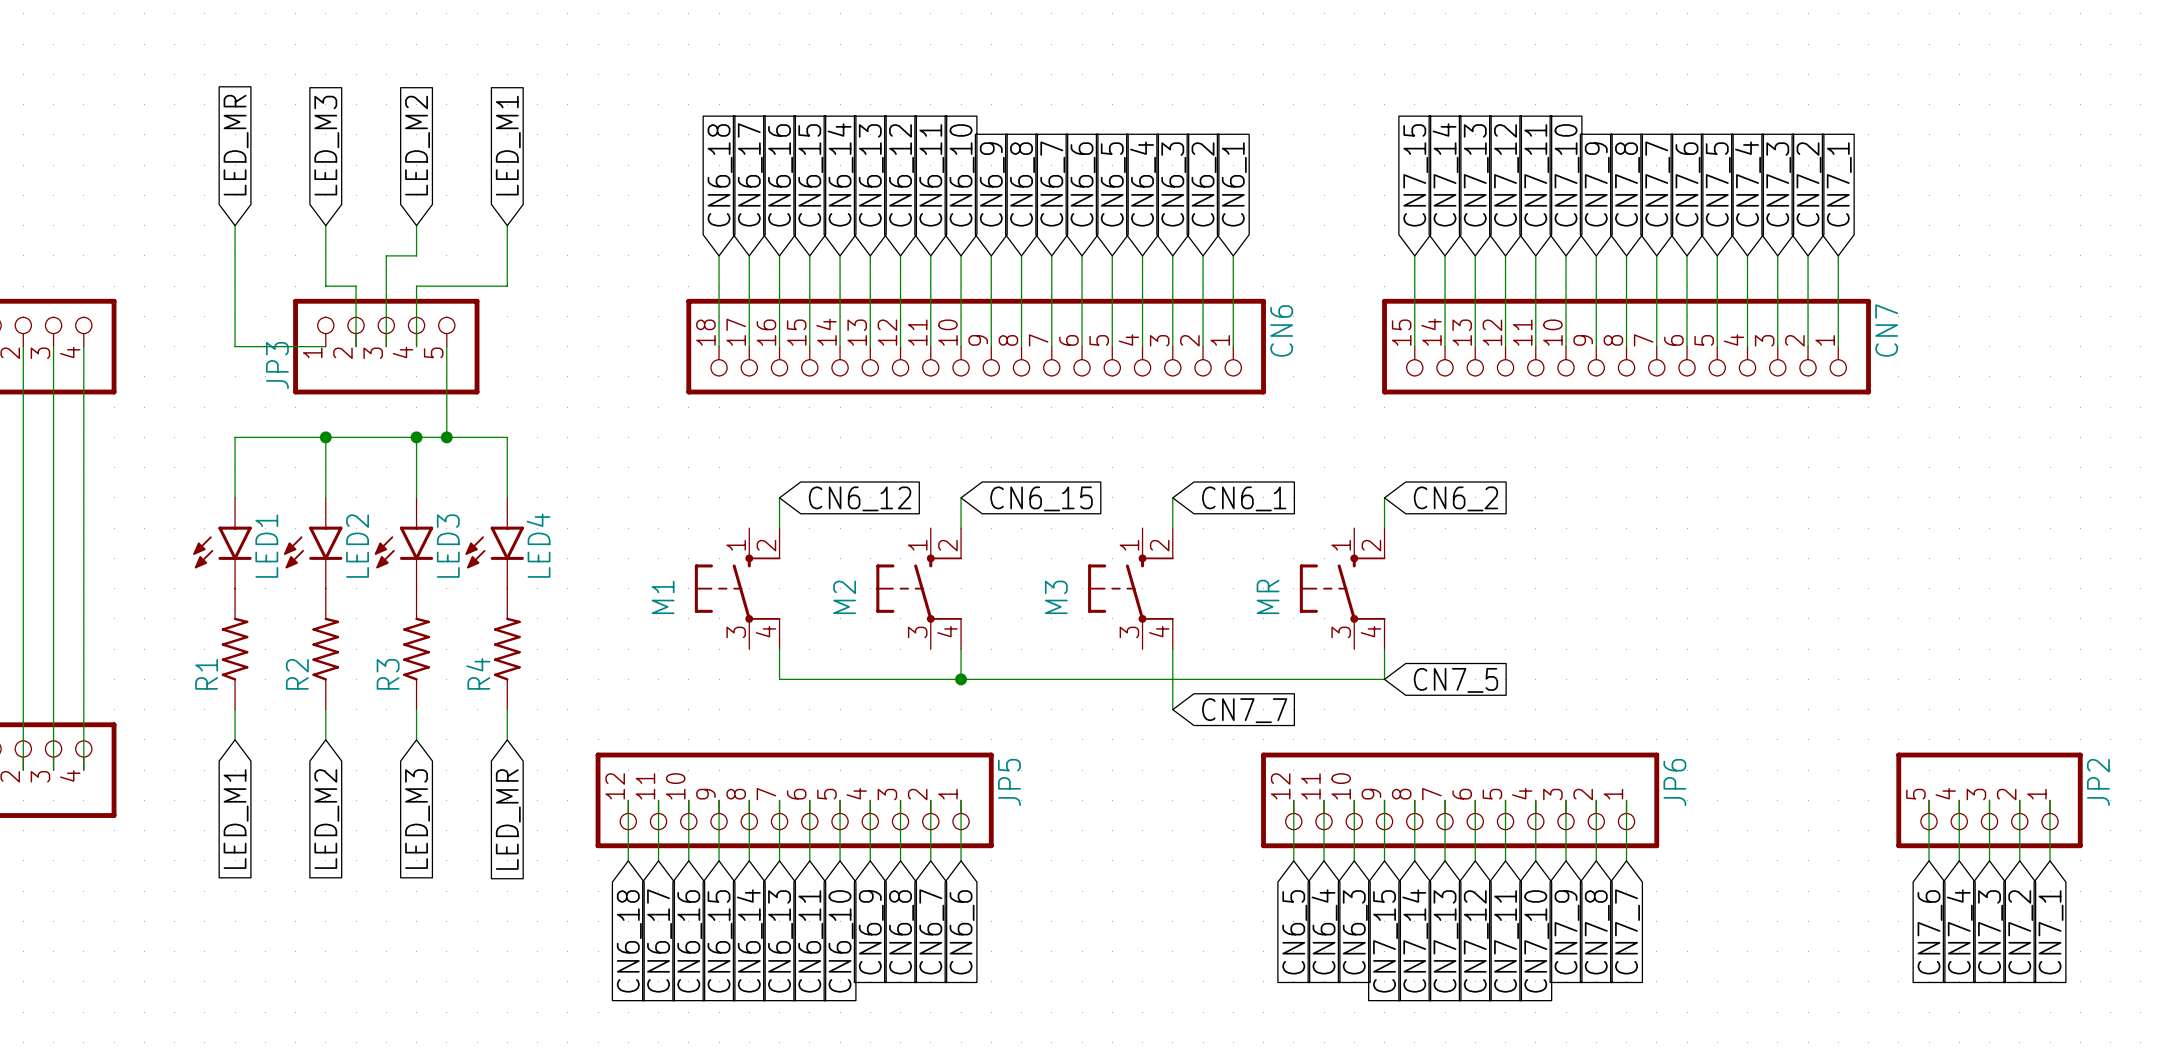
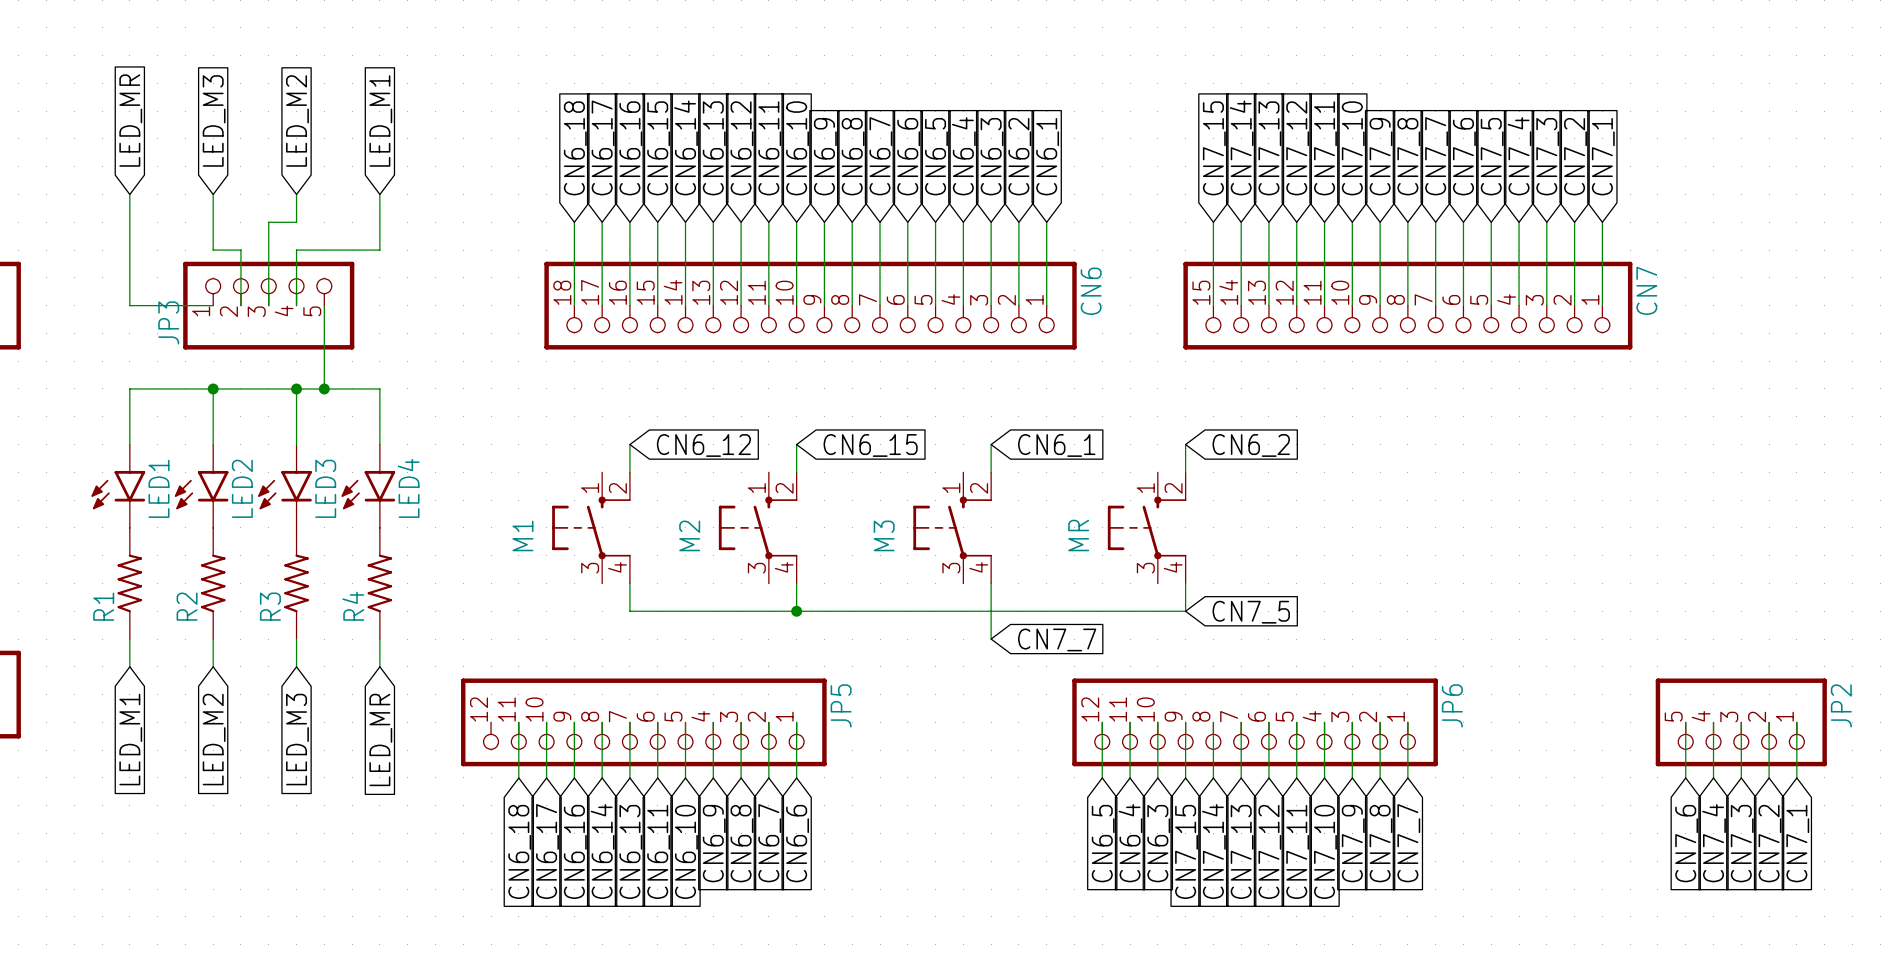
wire: (628, 800) (628, 860) -> none
global label: CN6_17 (659, 940) -> CN6_18 (519, 851)
global label: CN6_18 (629, 941) -> none
global label: CN6_16 (689, 941) -> CN6_17 (547, 851)
global label: CN6_15 (720, 941) -> CN6_16 (575, 851)

